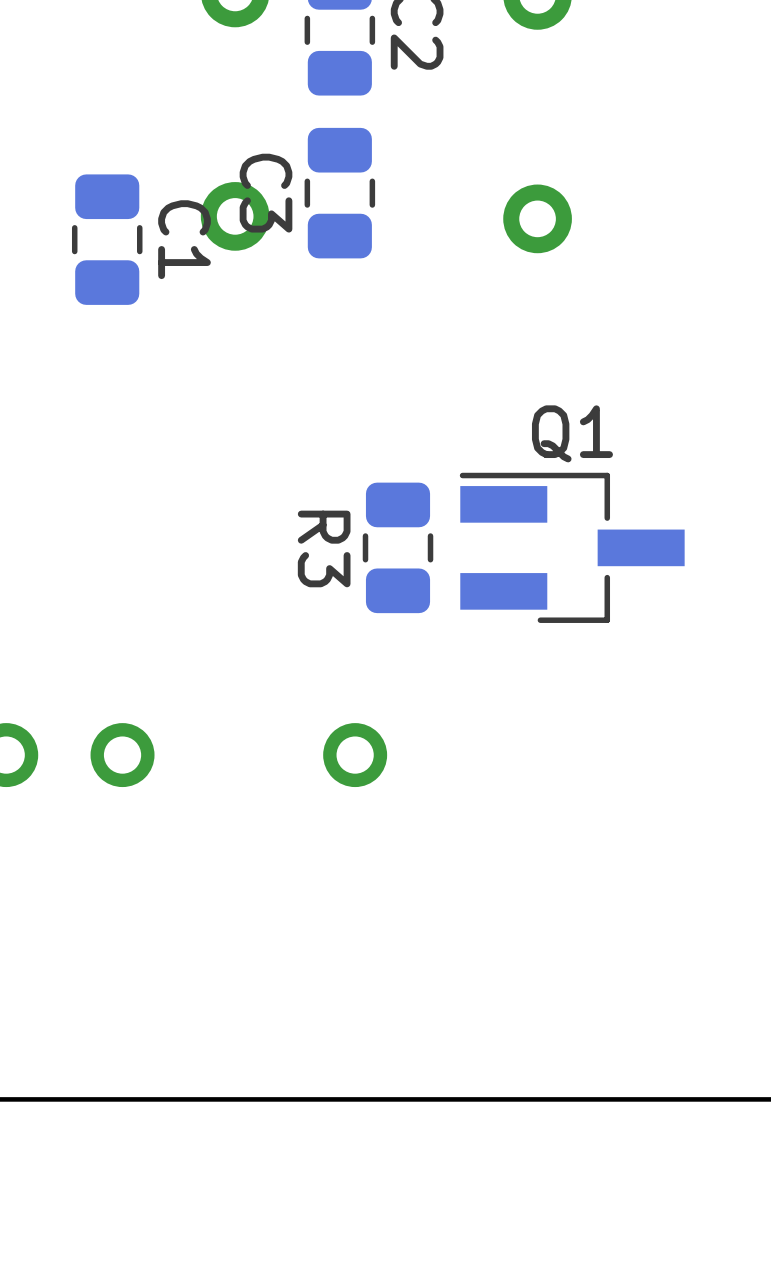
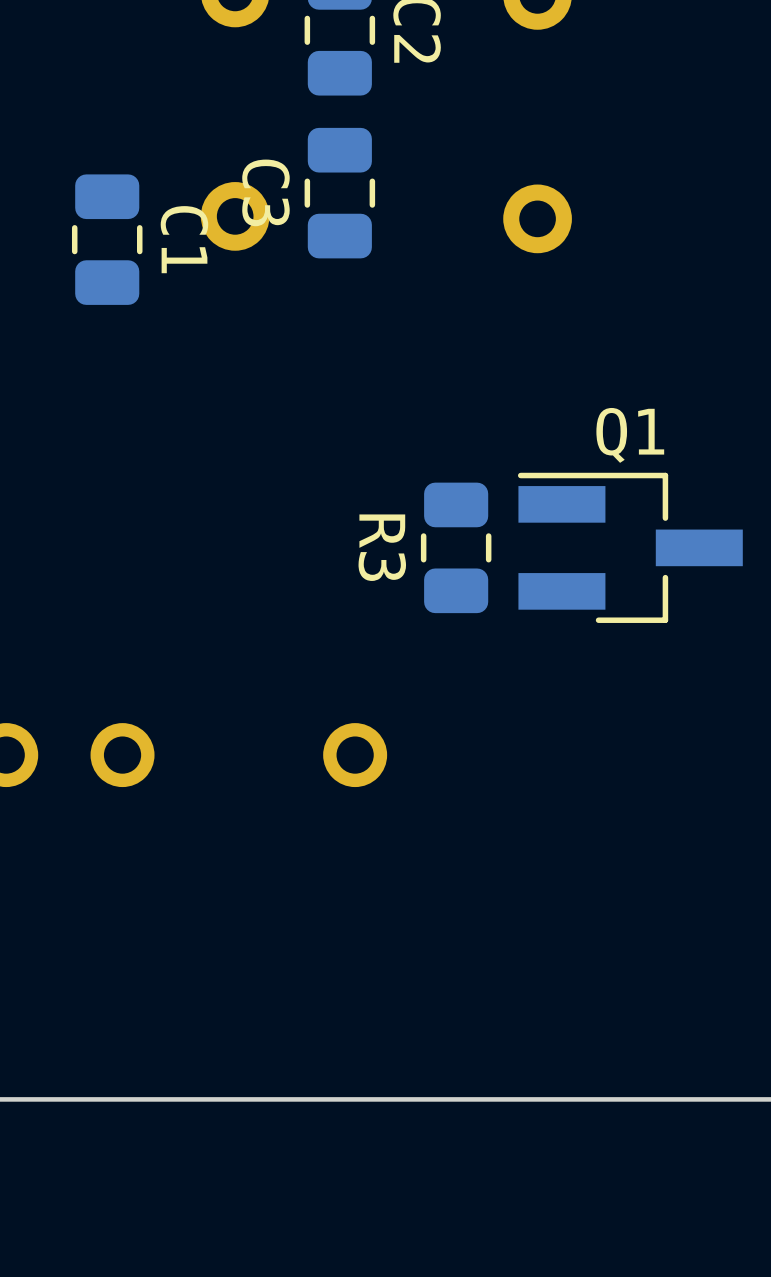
R3 position: (398, 547) -> (456, 547)
Q1 position: (572, 547) -> (630, 547)

